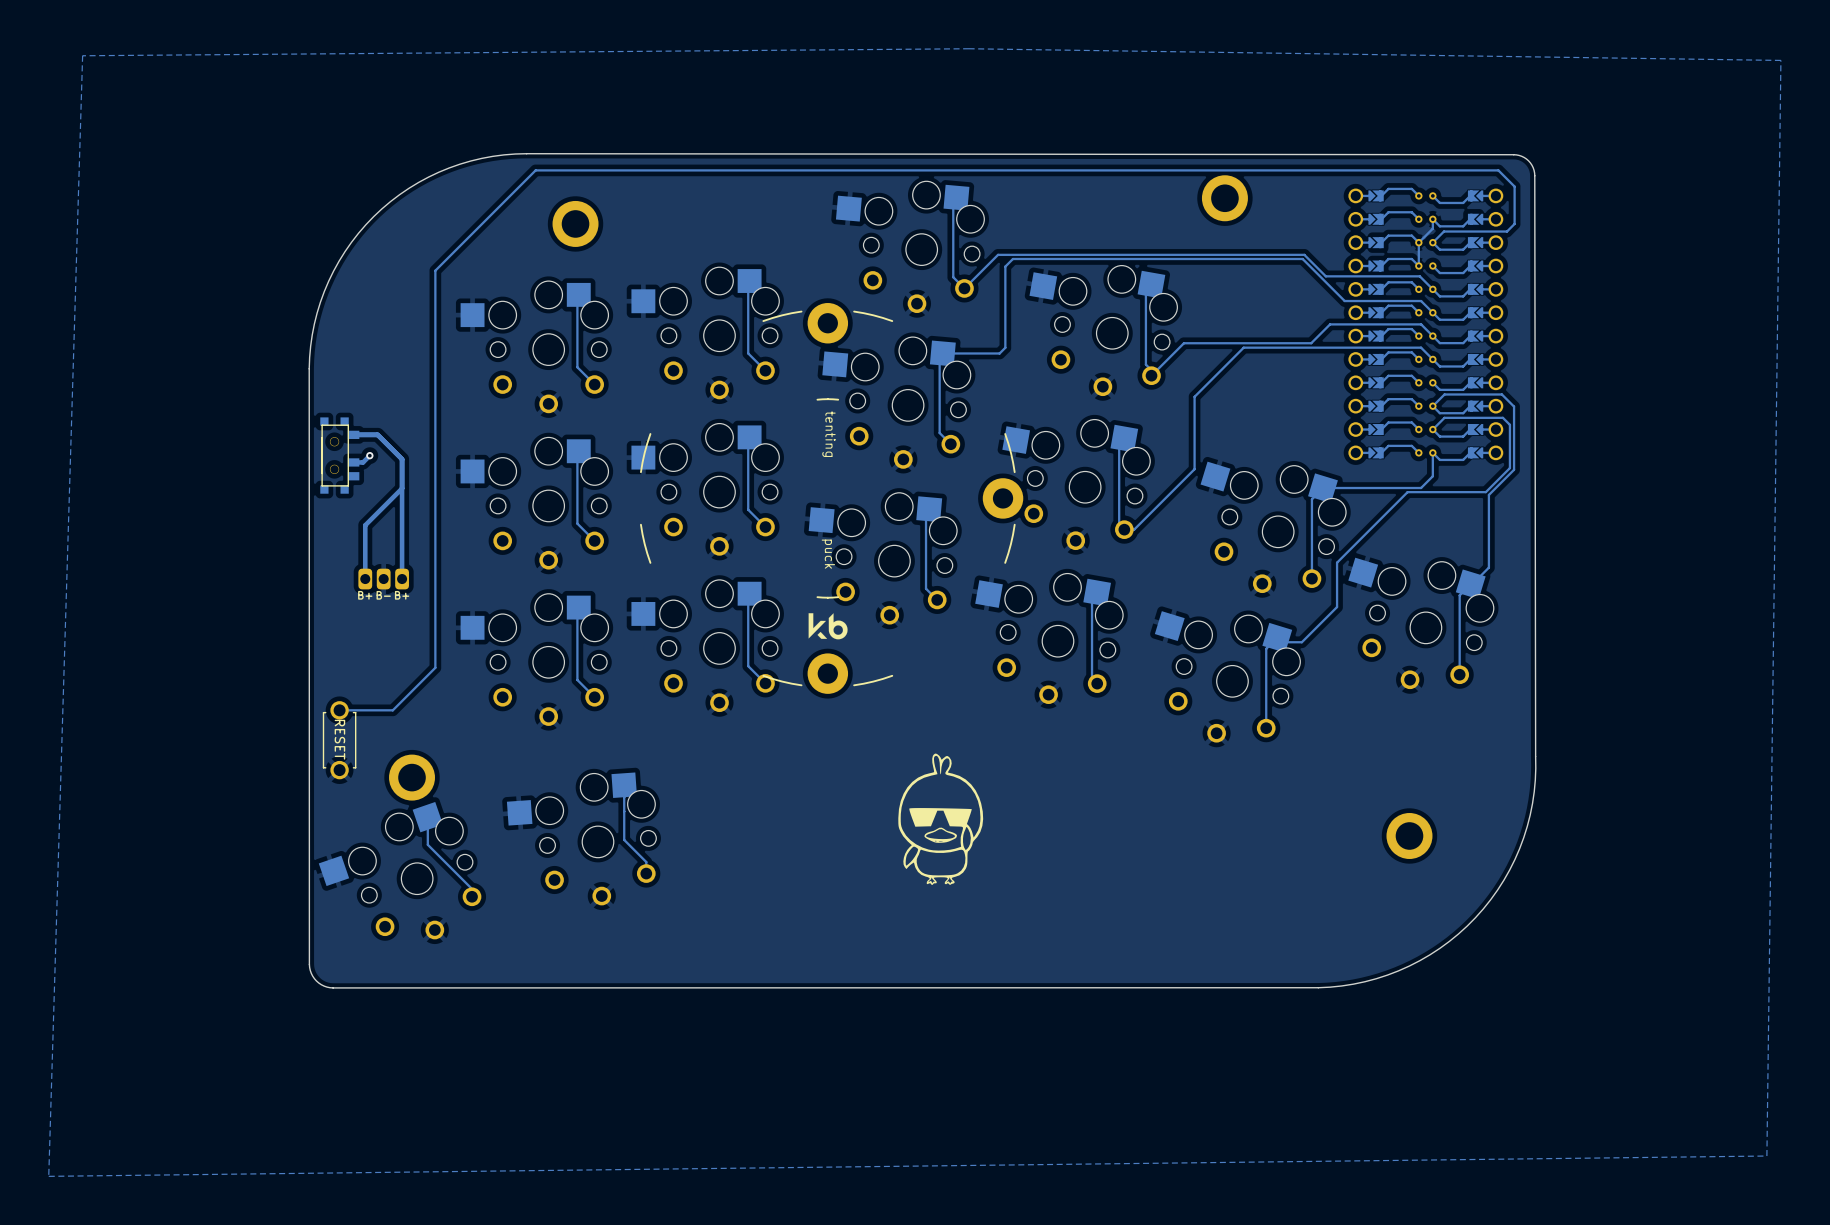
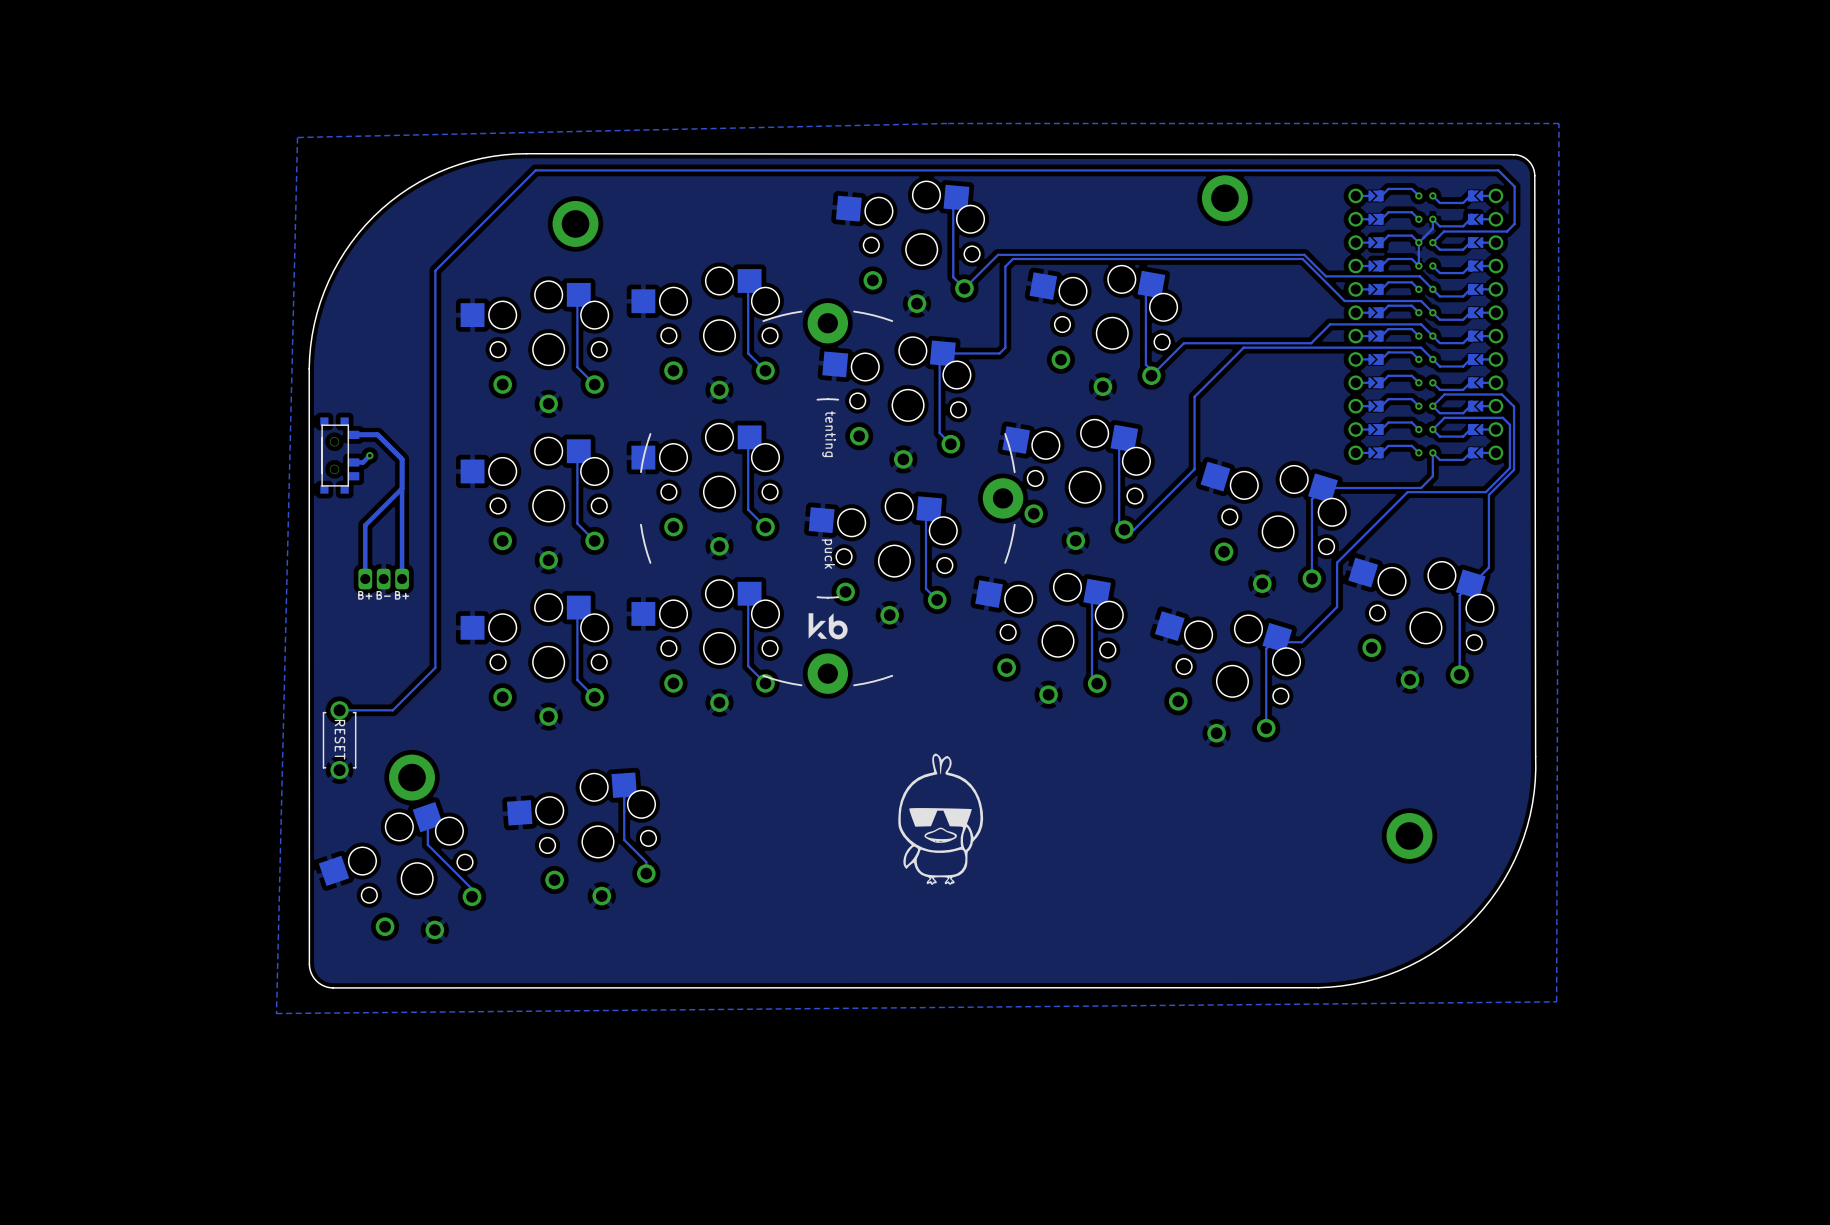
zone outline: (969, 48) (1780, 60) (1766, 1156) (48, 1176) (82, 55) (969, 48) -> (1558, 123) (1556, 1001) (276, 1013) (297, 137) (946, 123) (1558, 123)

